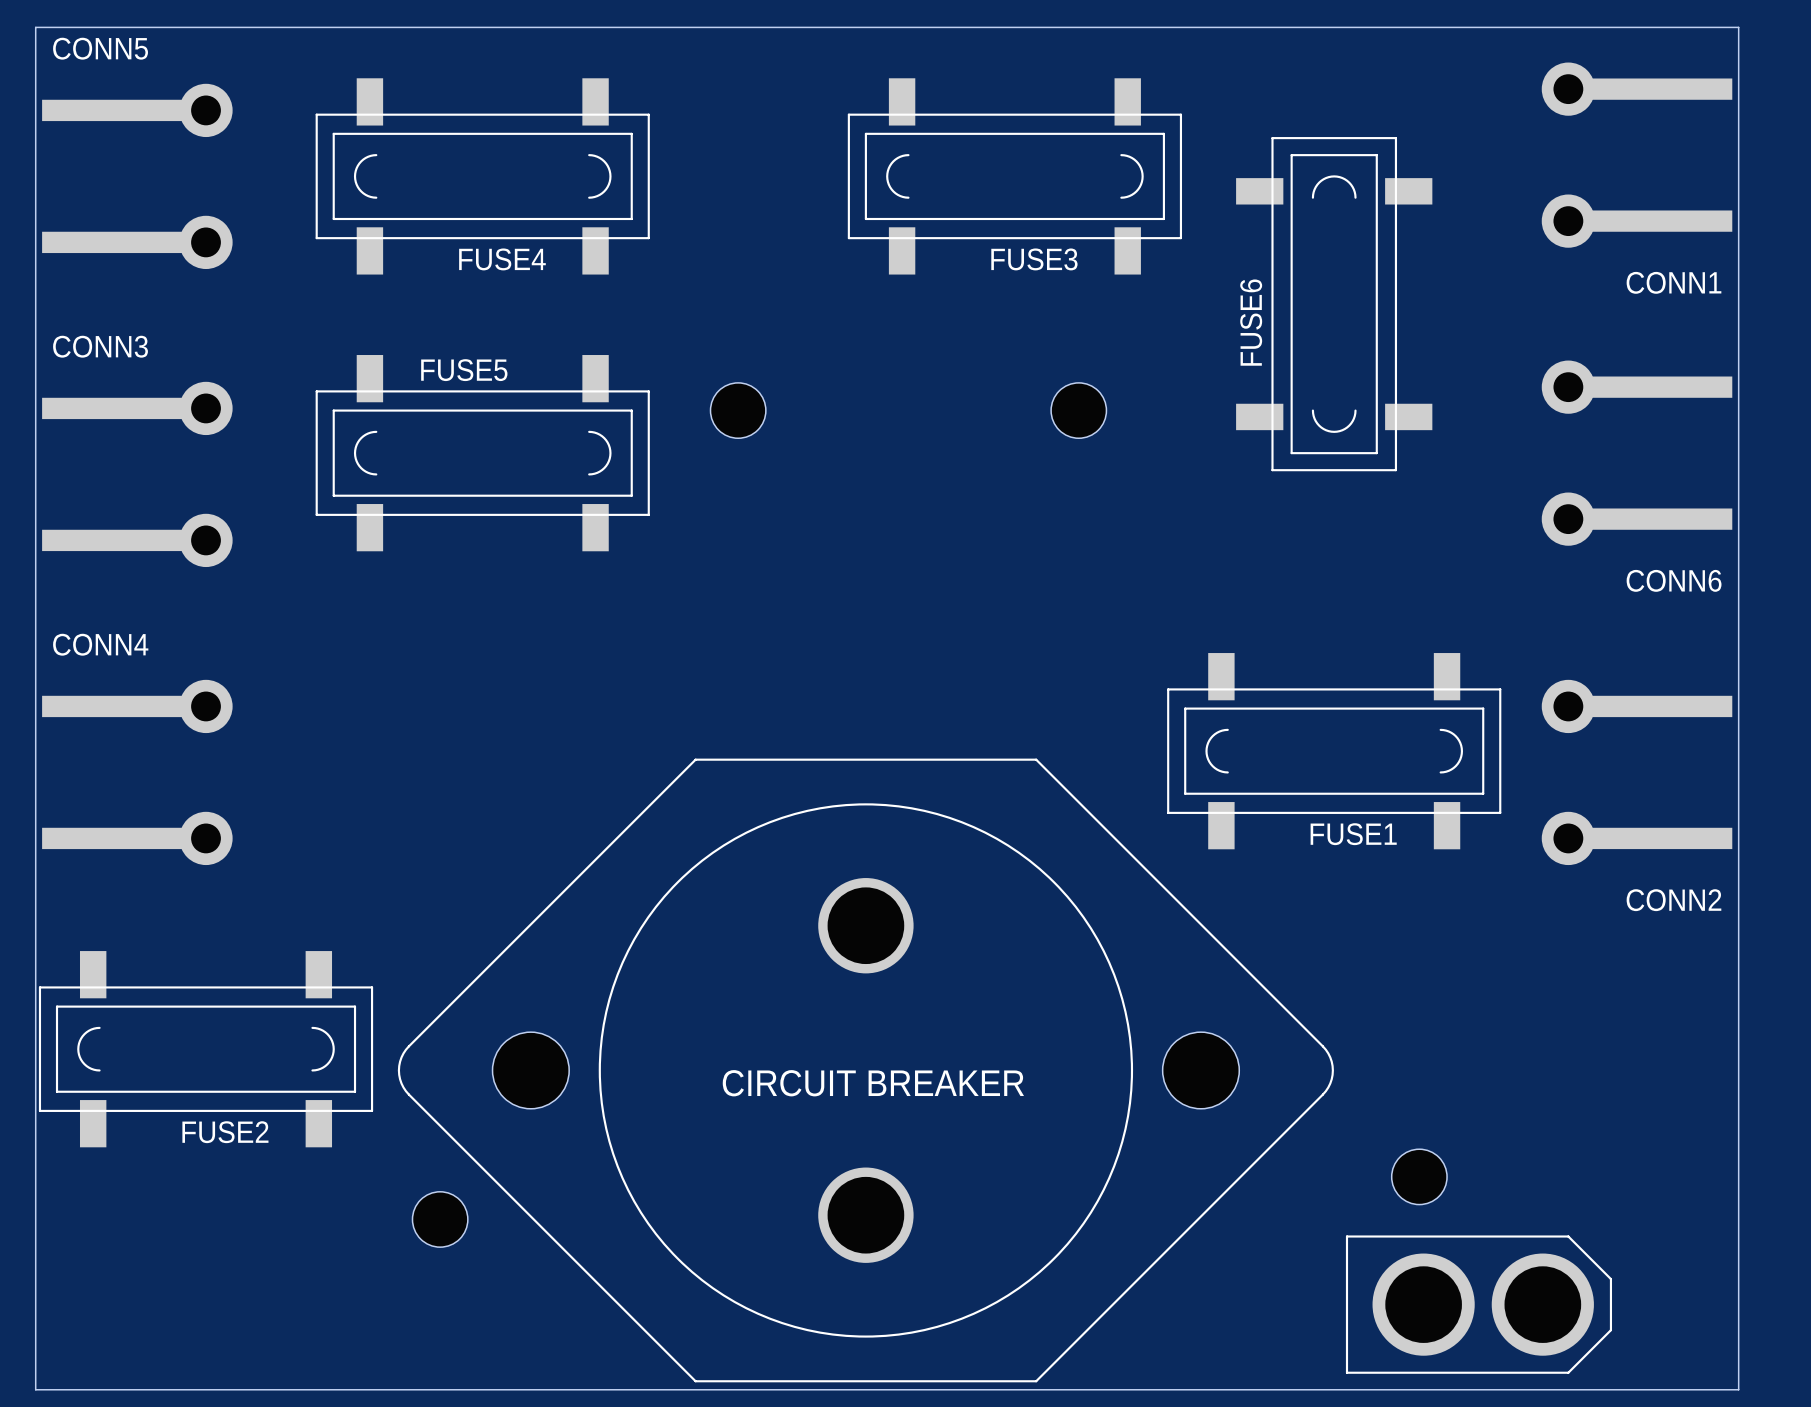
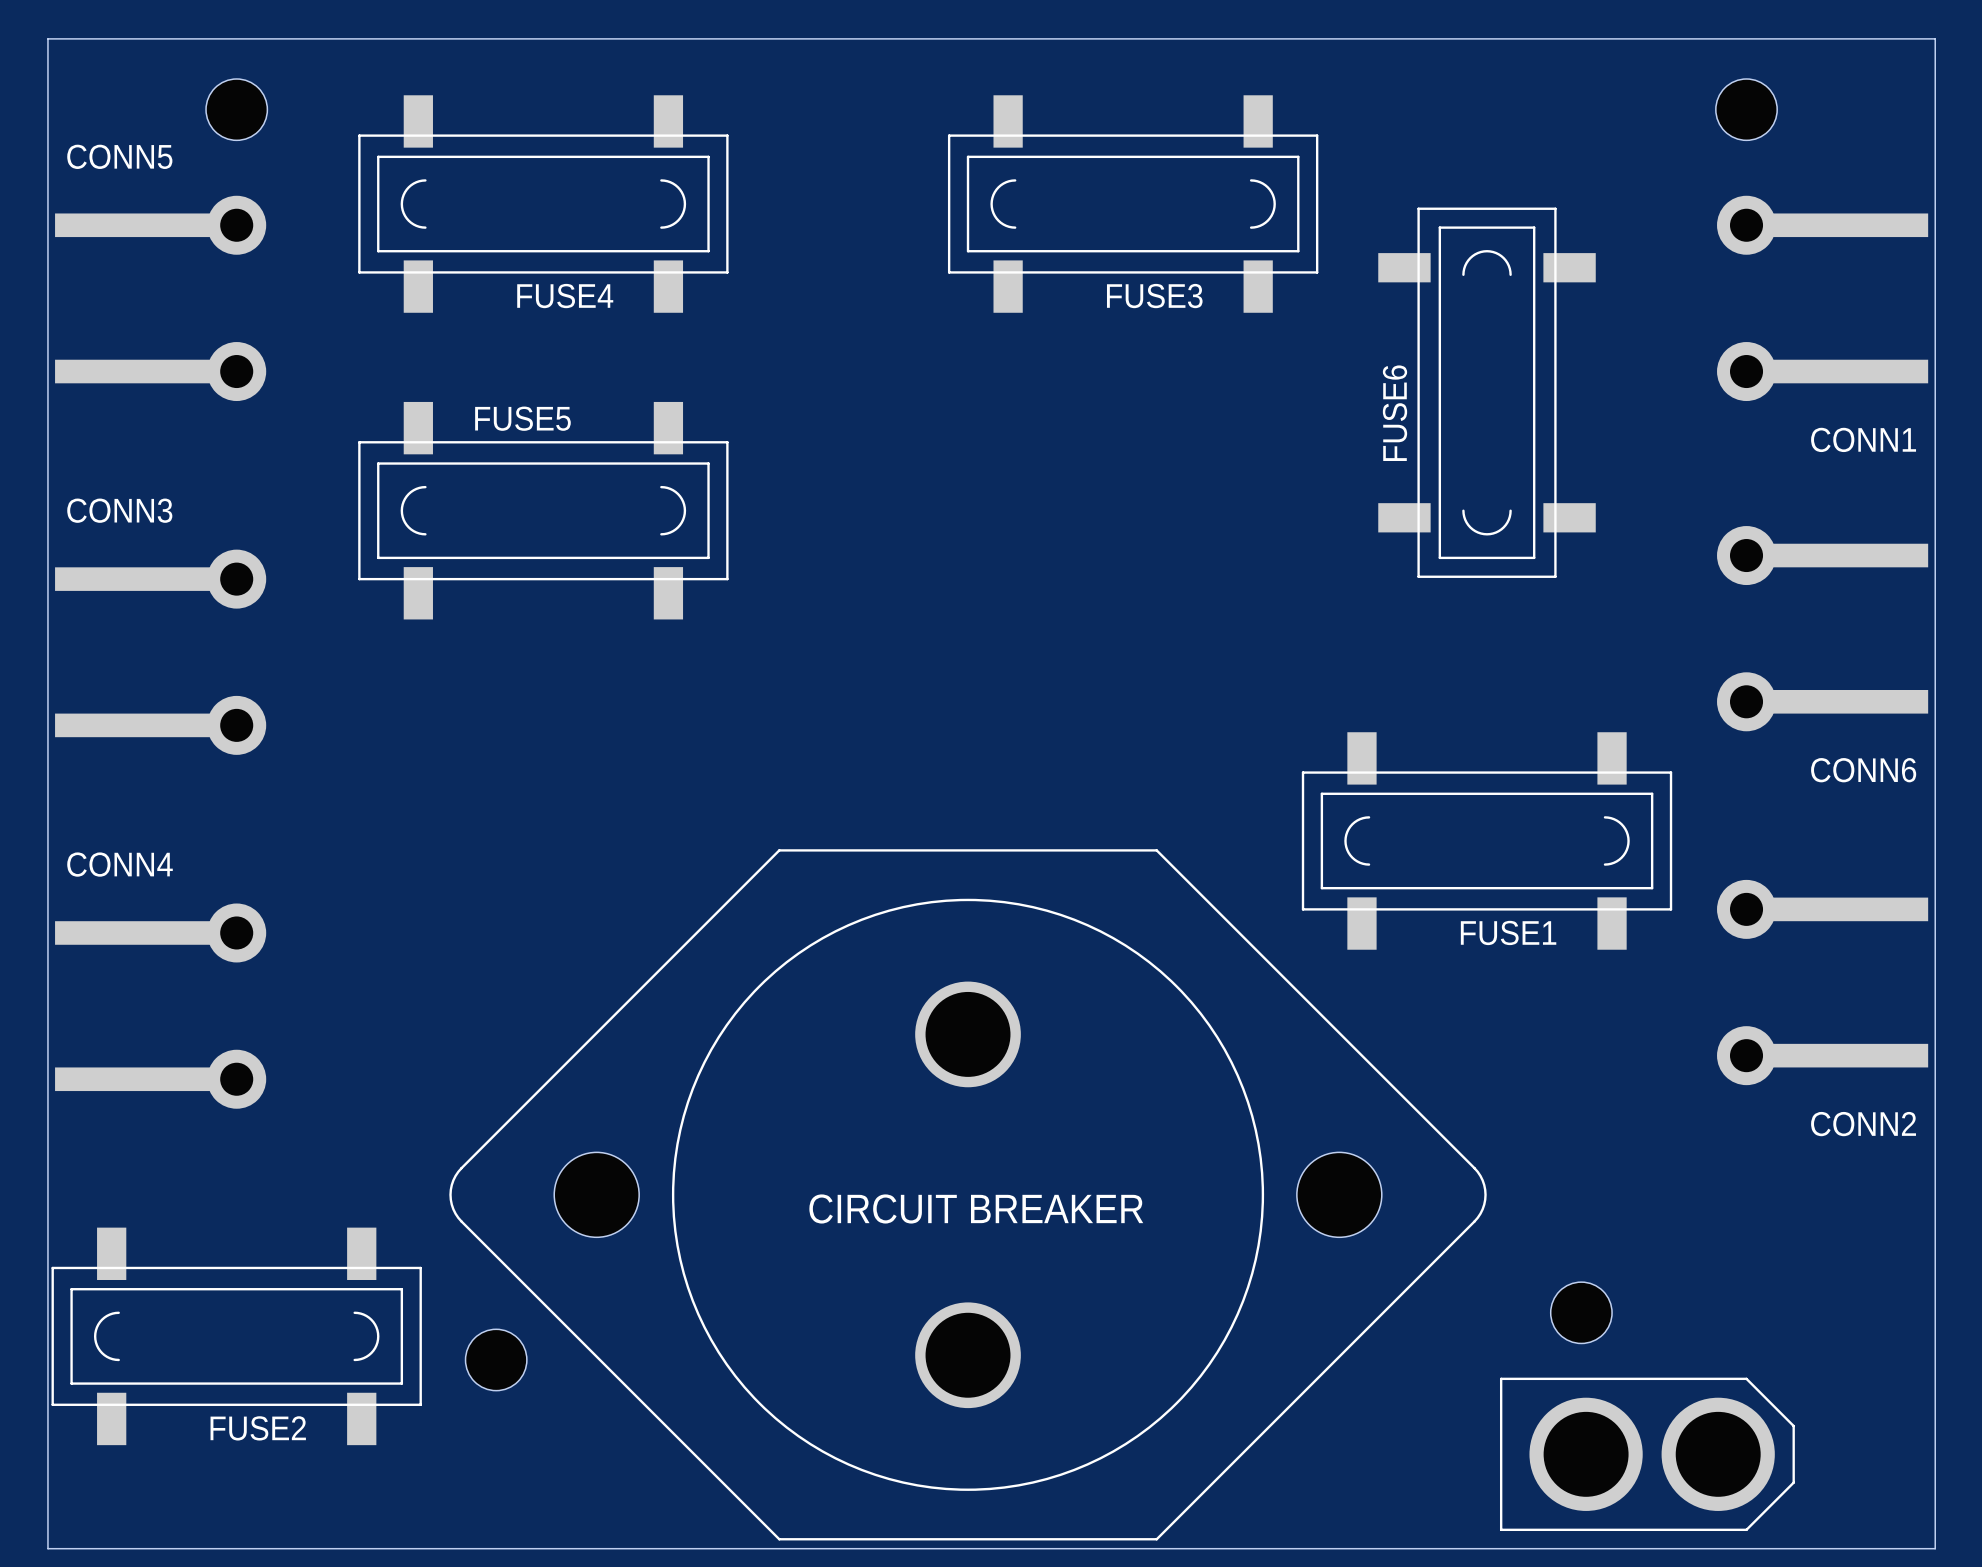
part: none -> (236, 109)
part: none -> (1746, 109)
CONN1 position: (1637, 155) -> (1822, 298)
CONN5 position: (137, 176) -> (160, 298)
FUSE6 position: (1334, 304) -> (1487, 392)
part: (738, 410) -> none
part: (1078, 410) -> none
CONN6 position: (1637, 453) -> (1822, 628)
CONN3 position: (137, 474) -> (160, 652)
CONN4 position: (137, 772) -> (160, 1006)
CONN2 position: (1637, 772) -> (1822, 982)
FUSE2 position: (206, 1049) -> (236, 1336)

